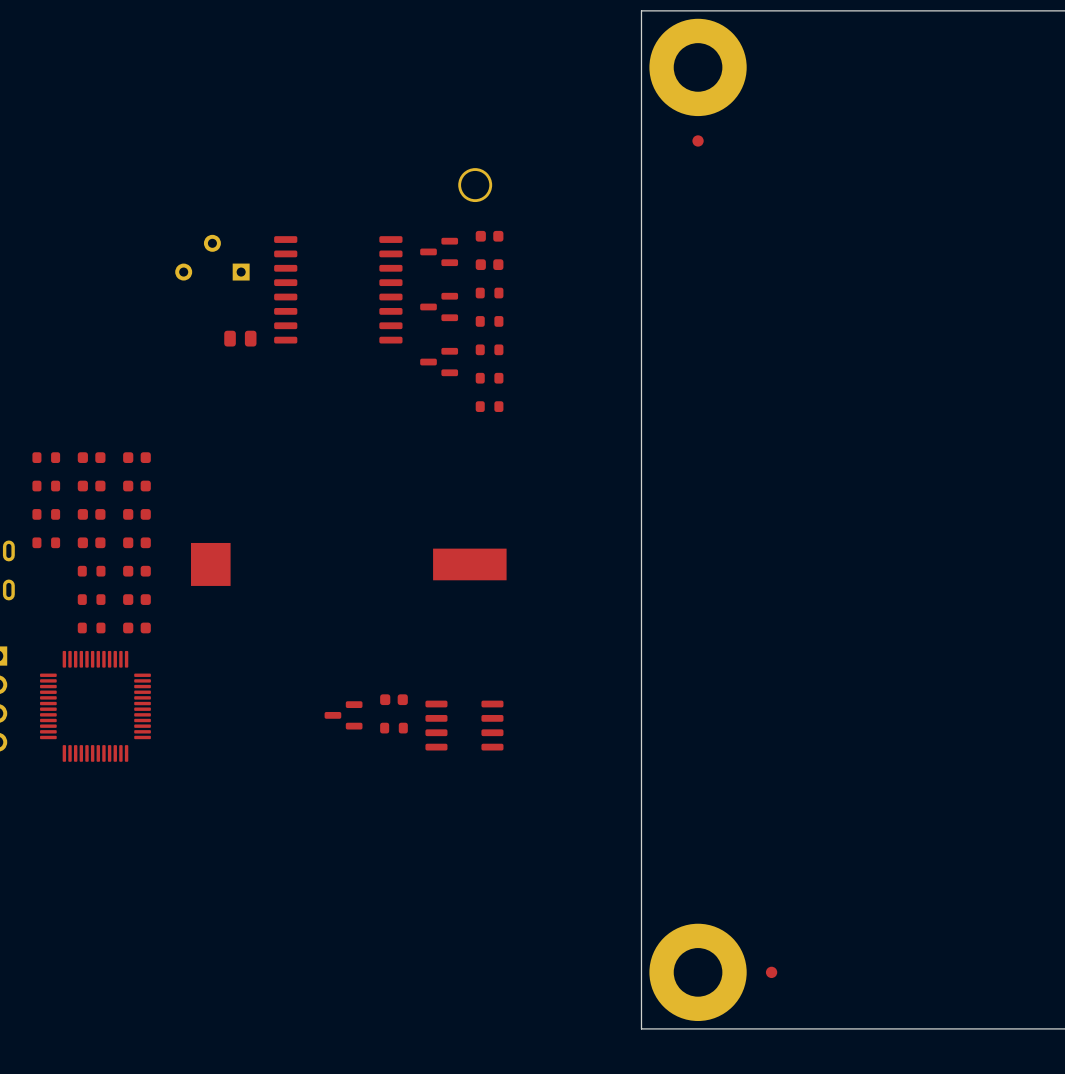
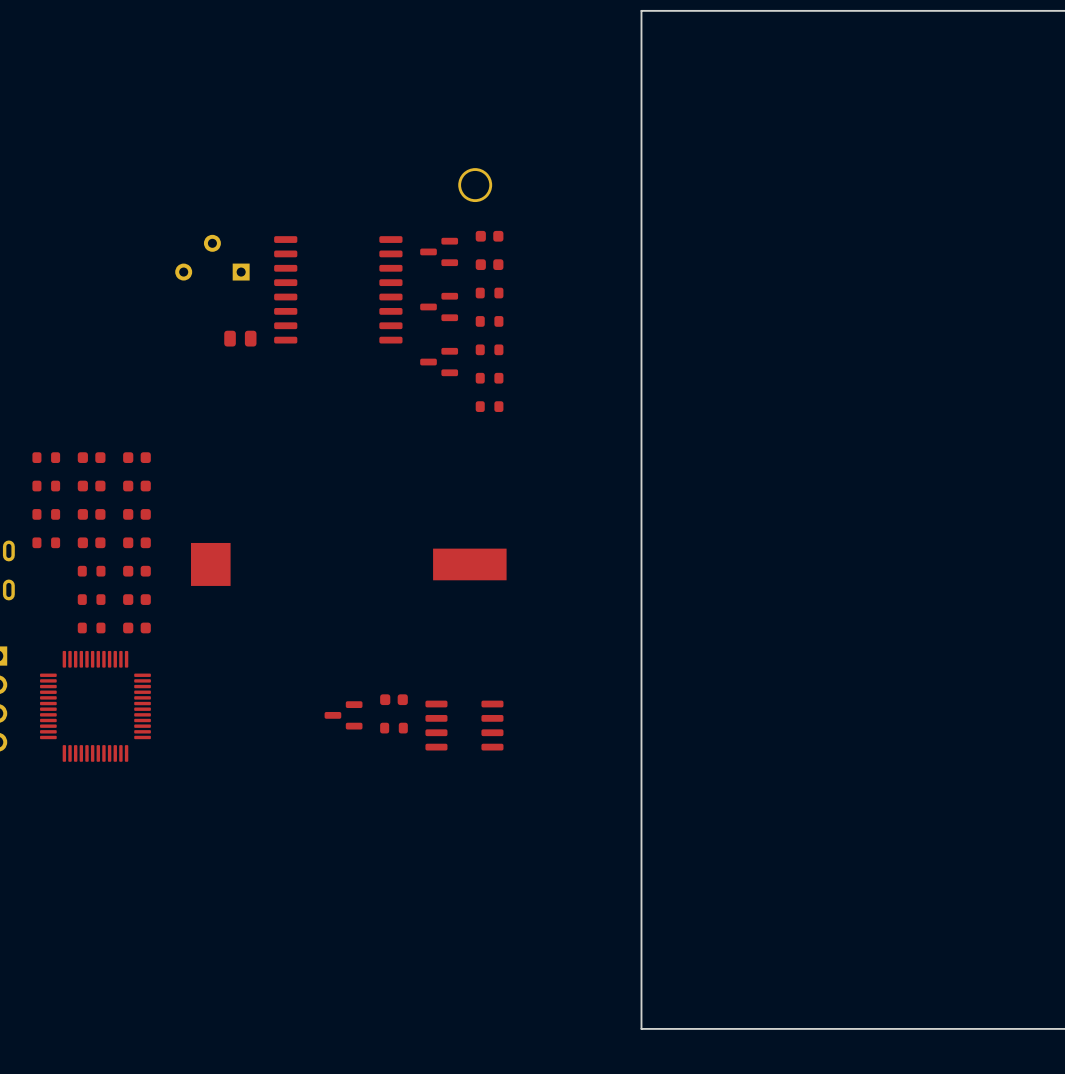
part: (698, 67) -> none
part: (698, 140) -> none
part: (698, 972) -> none
part: (771, 972) -> none

